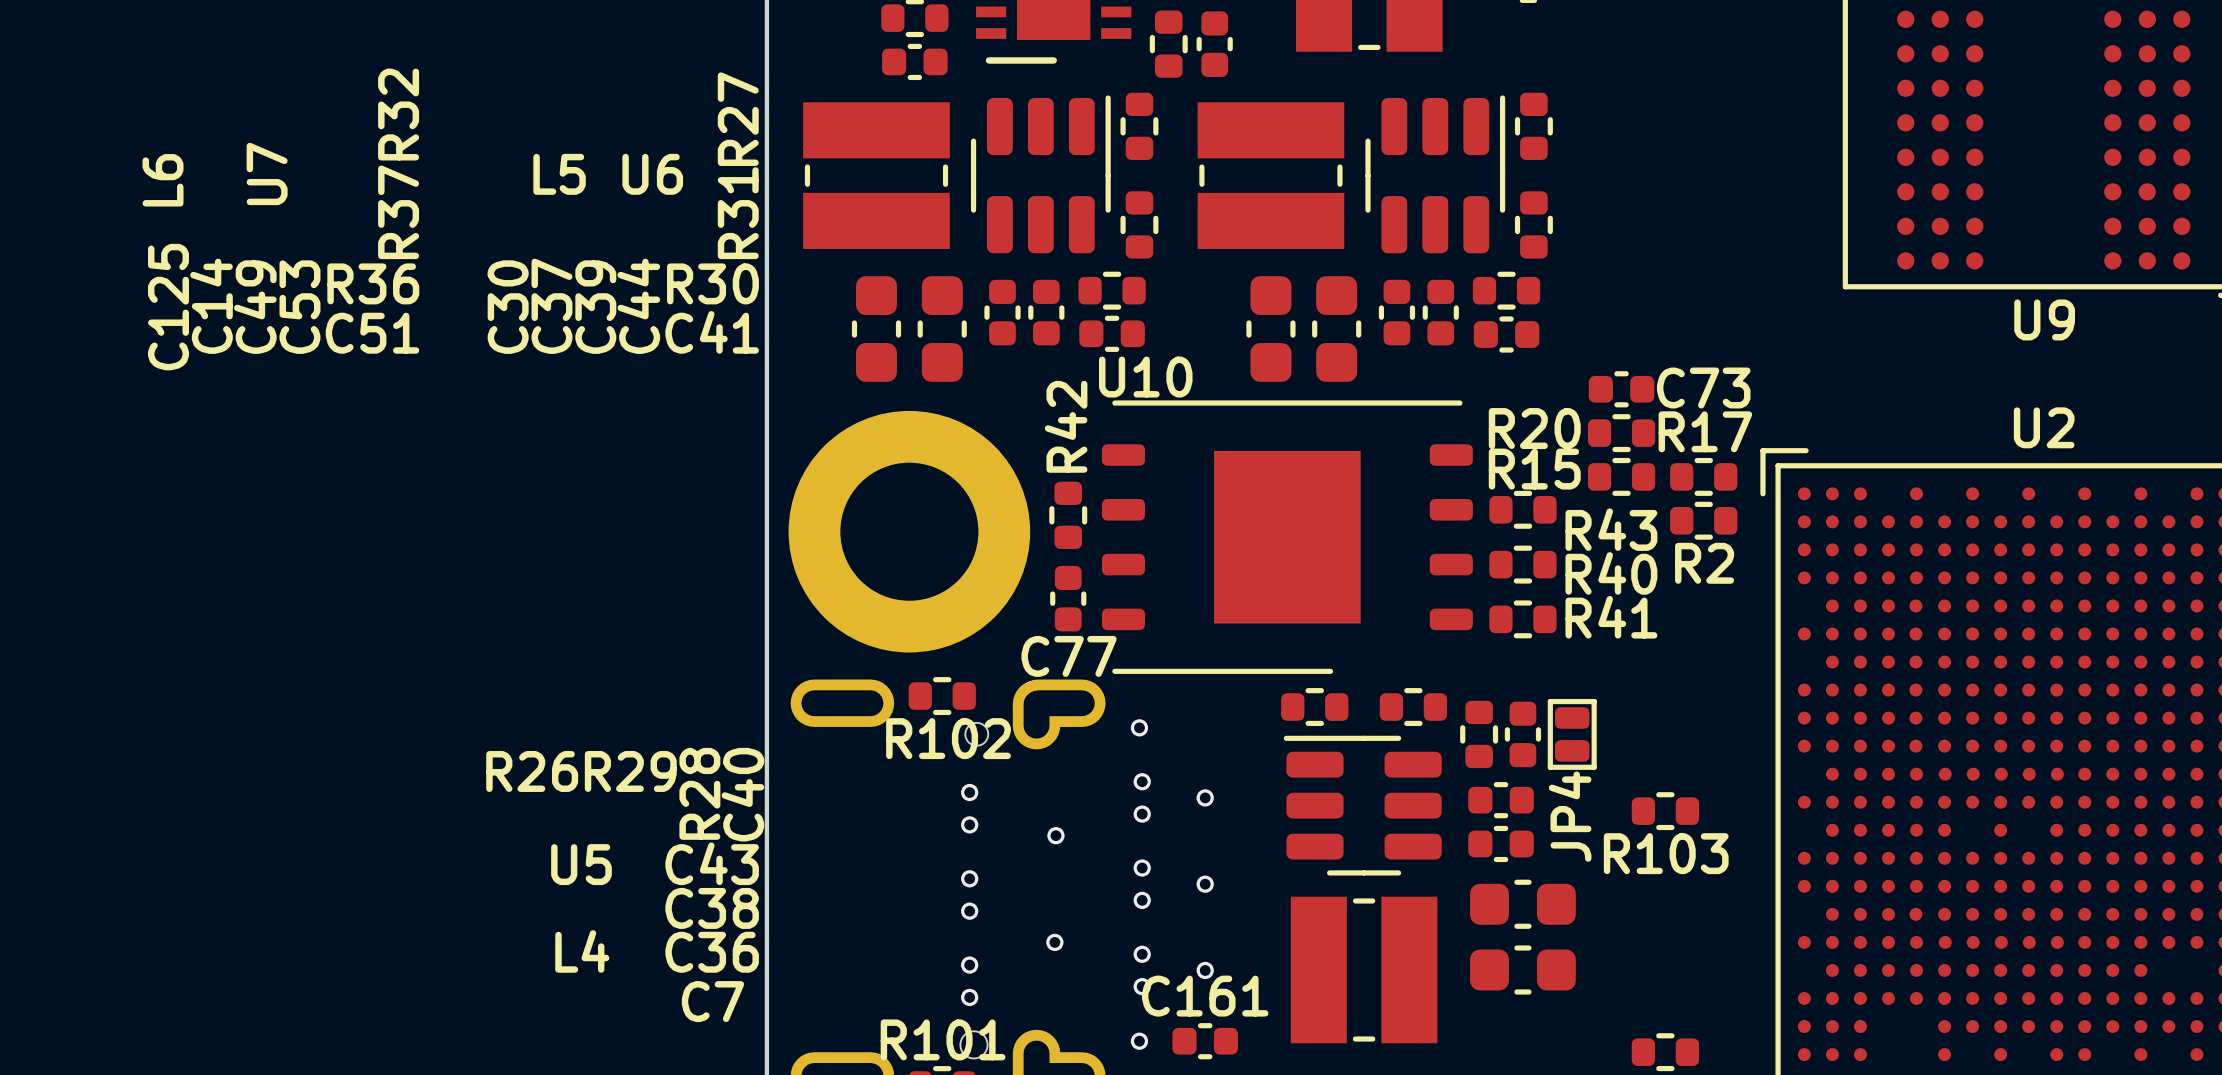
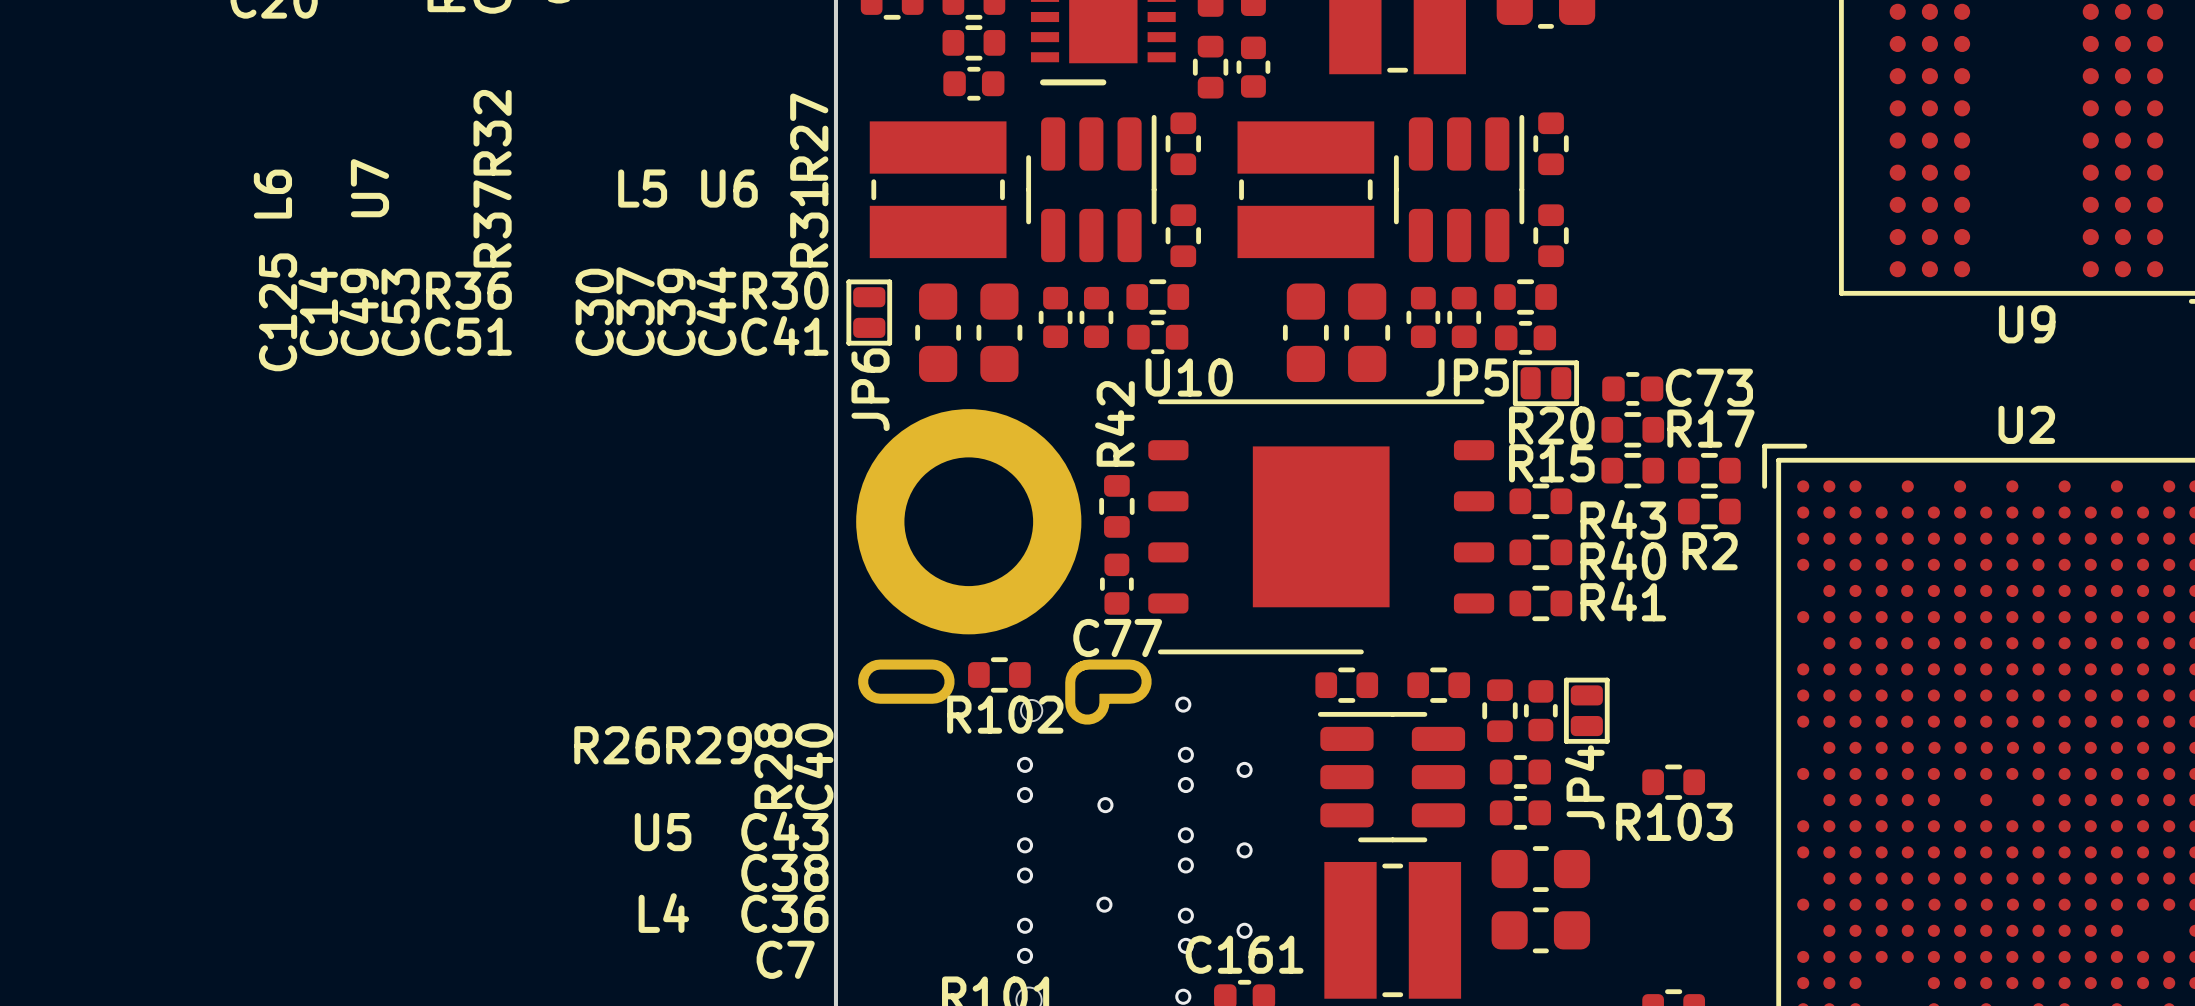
JP6: none -> (869, 312)
JP5: none -> (1545, 383)

